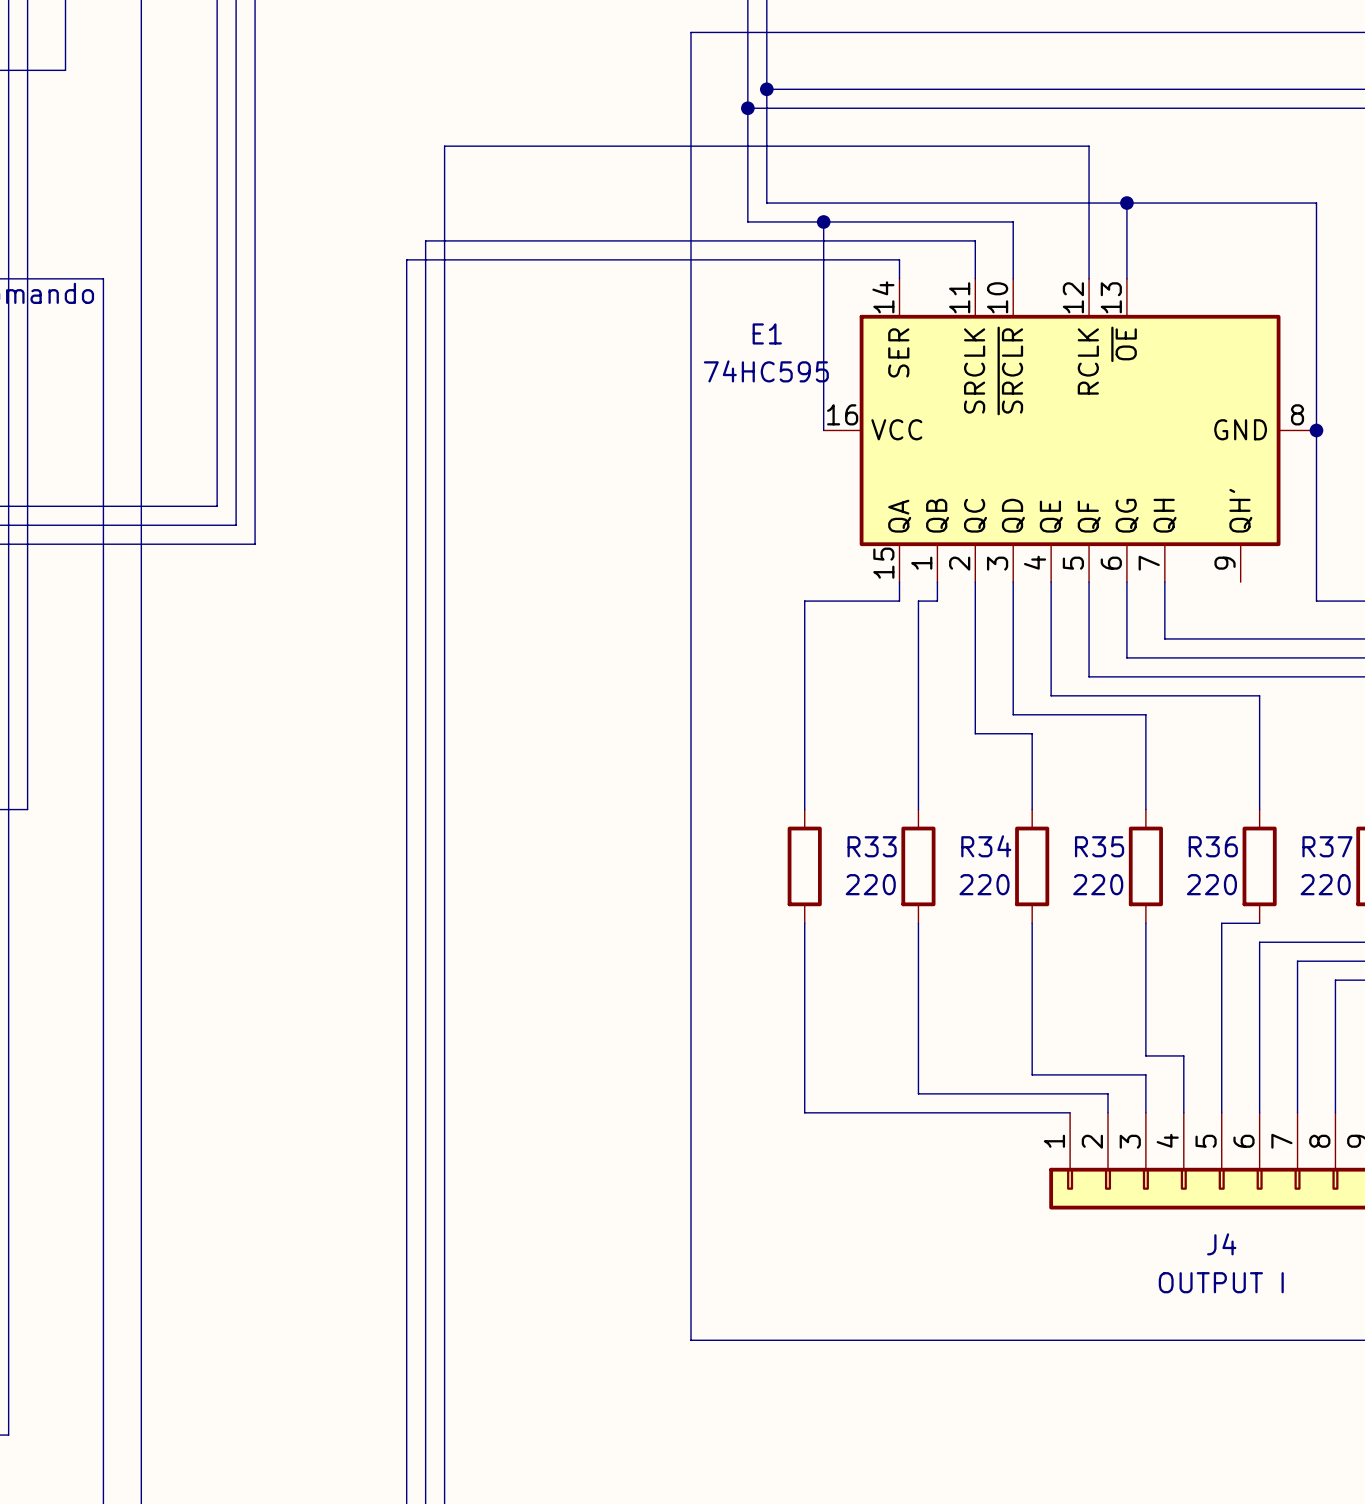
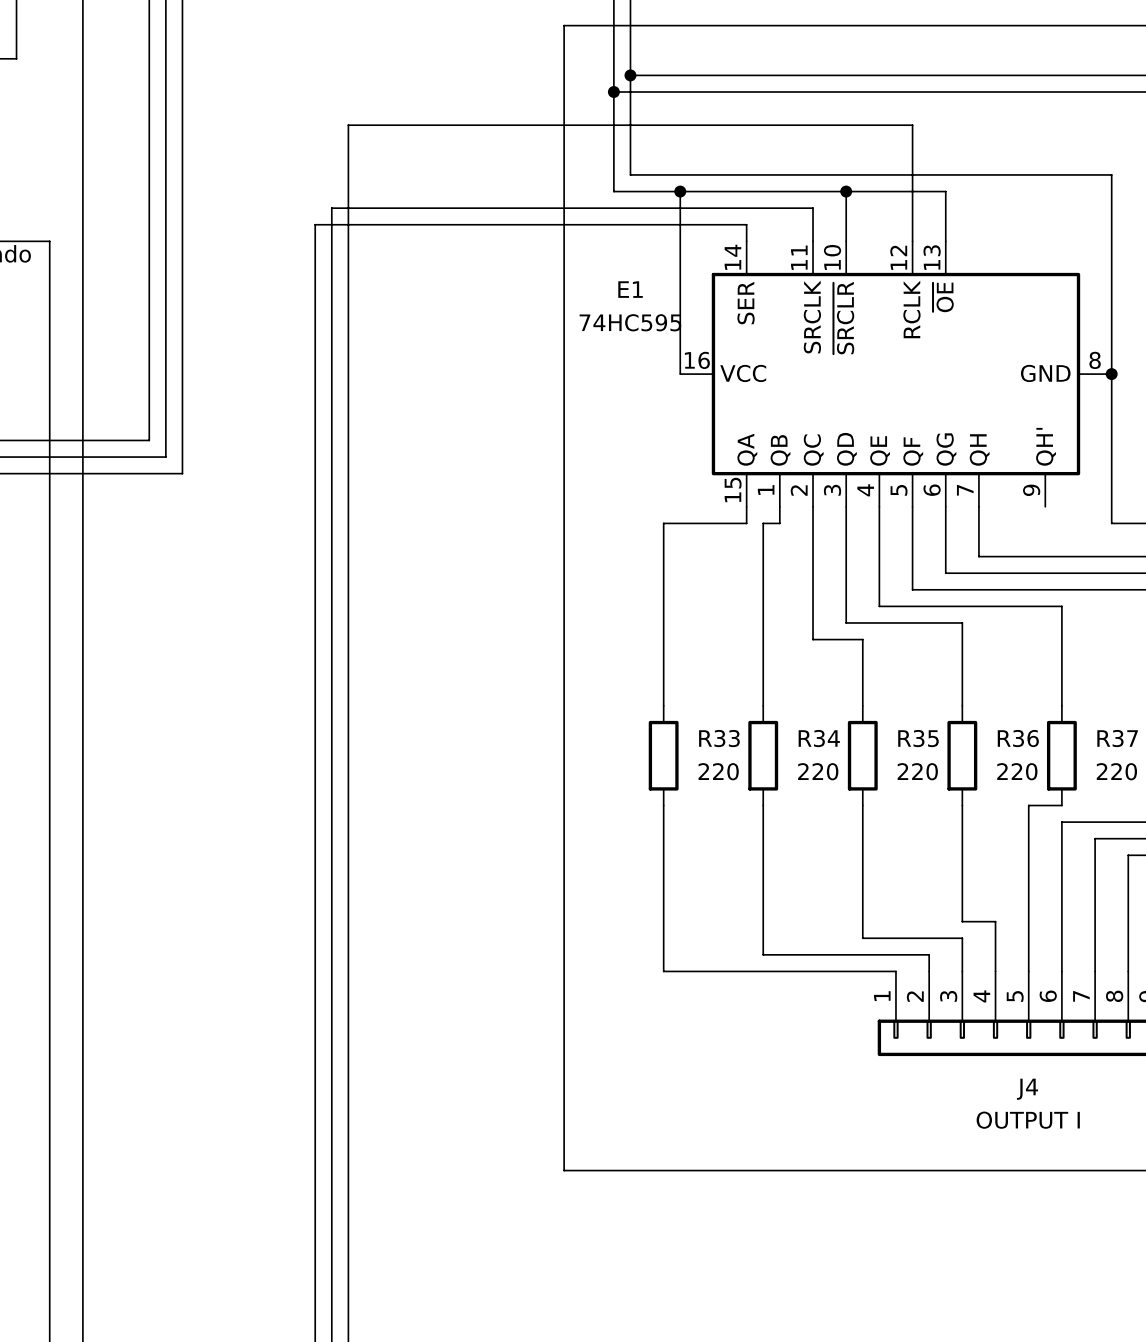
wire: (1126, 203) (1126, 221) -> (846, 191) (945, 191)
junction: (1126, 203) -> none
junction: none -> (846, 191)

